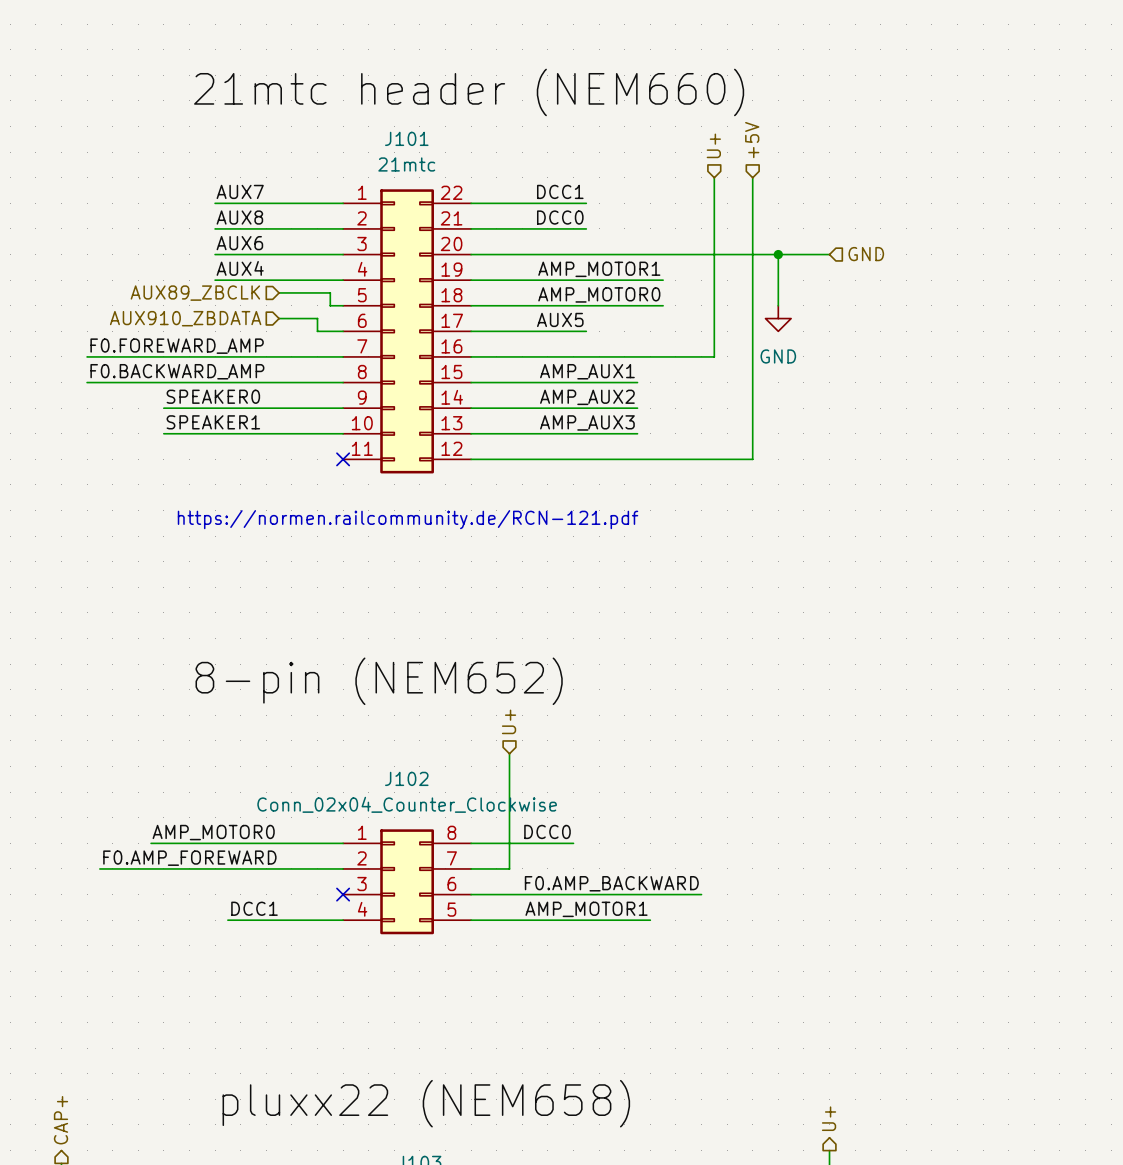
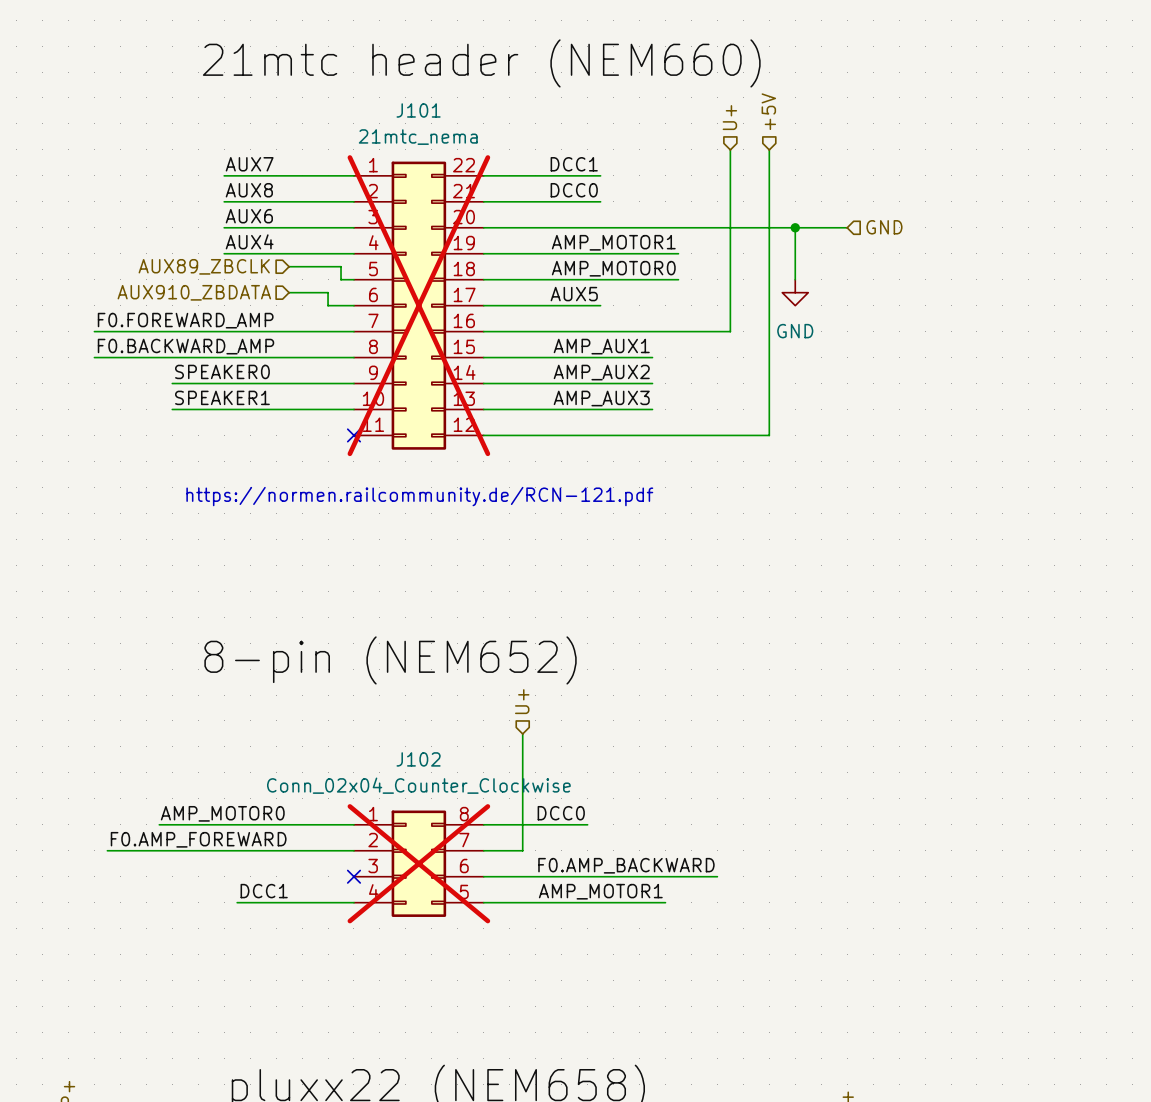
J101 value: 21mtc (406, 164) -> 21mtc_nema (418, 137)
J101 do-not-place cross: none -> (418, 305)
J102 do-not-place cross: none -> (418, 863)

